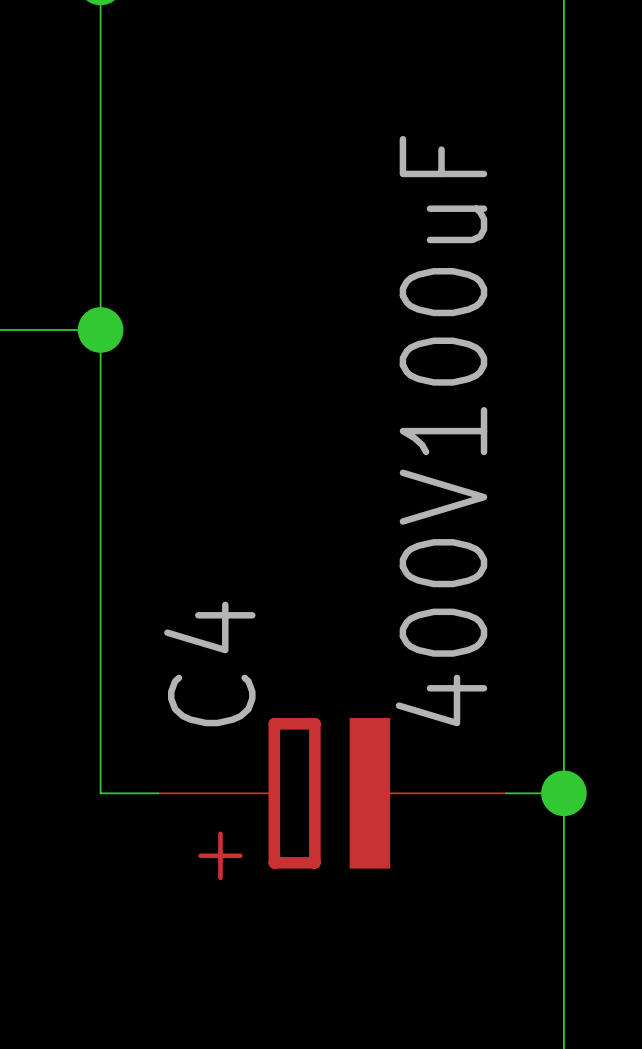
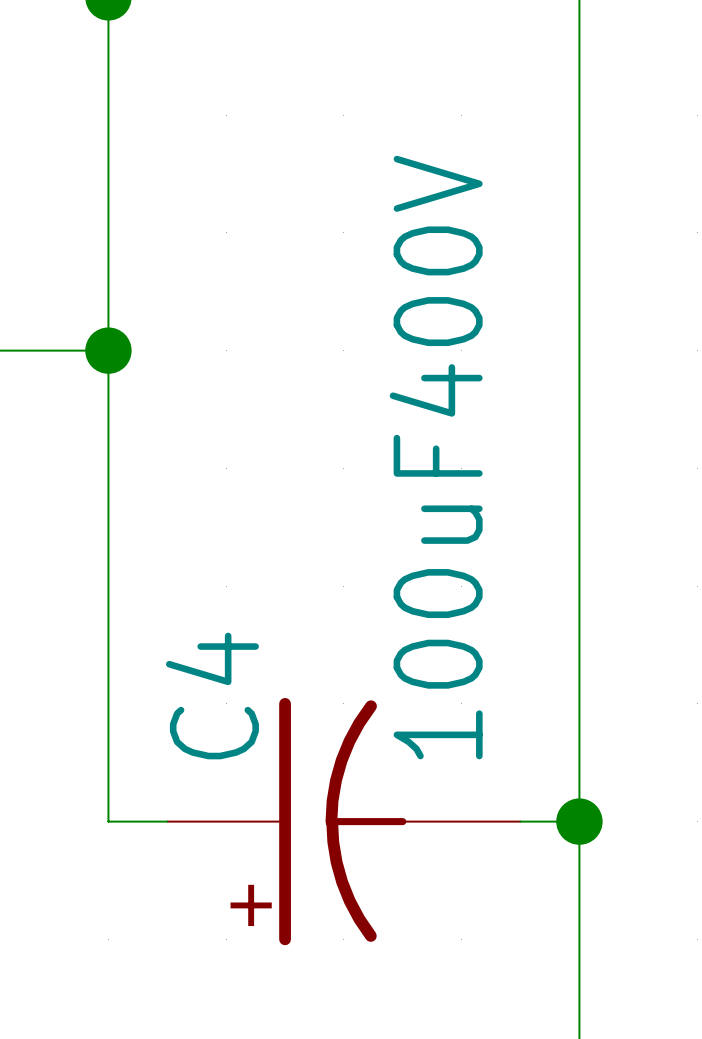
C4 value: 400V100uF (441, 431) -> 100uF400V (436, 457)
C4 symbol: [158, 718, 507, 869] -> [167, 697, 521, 946]

